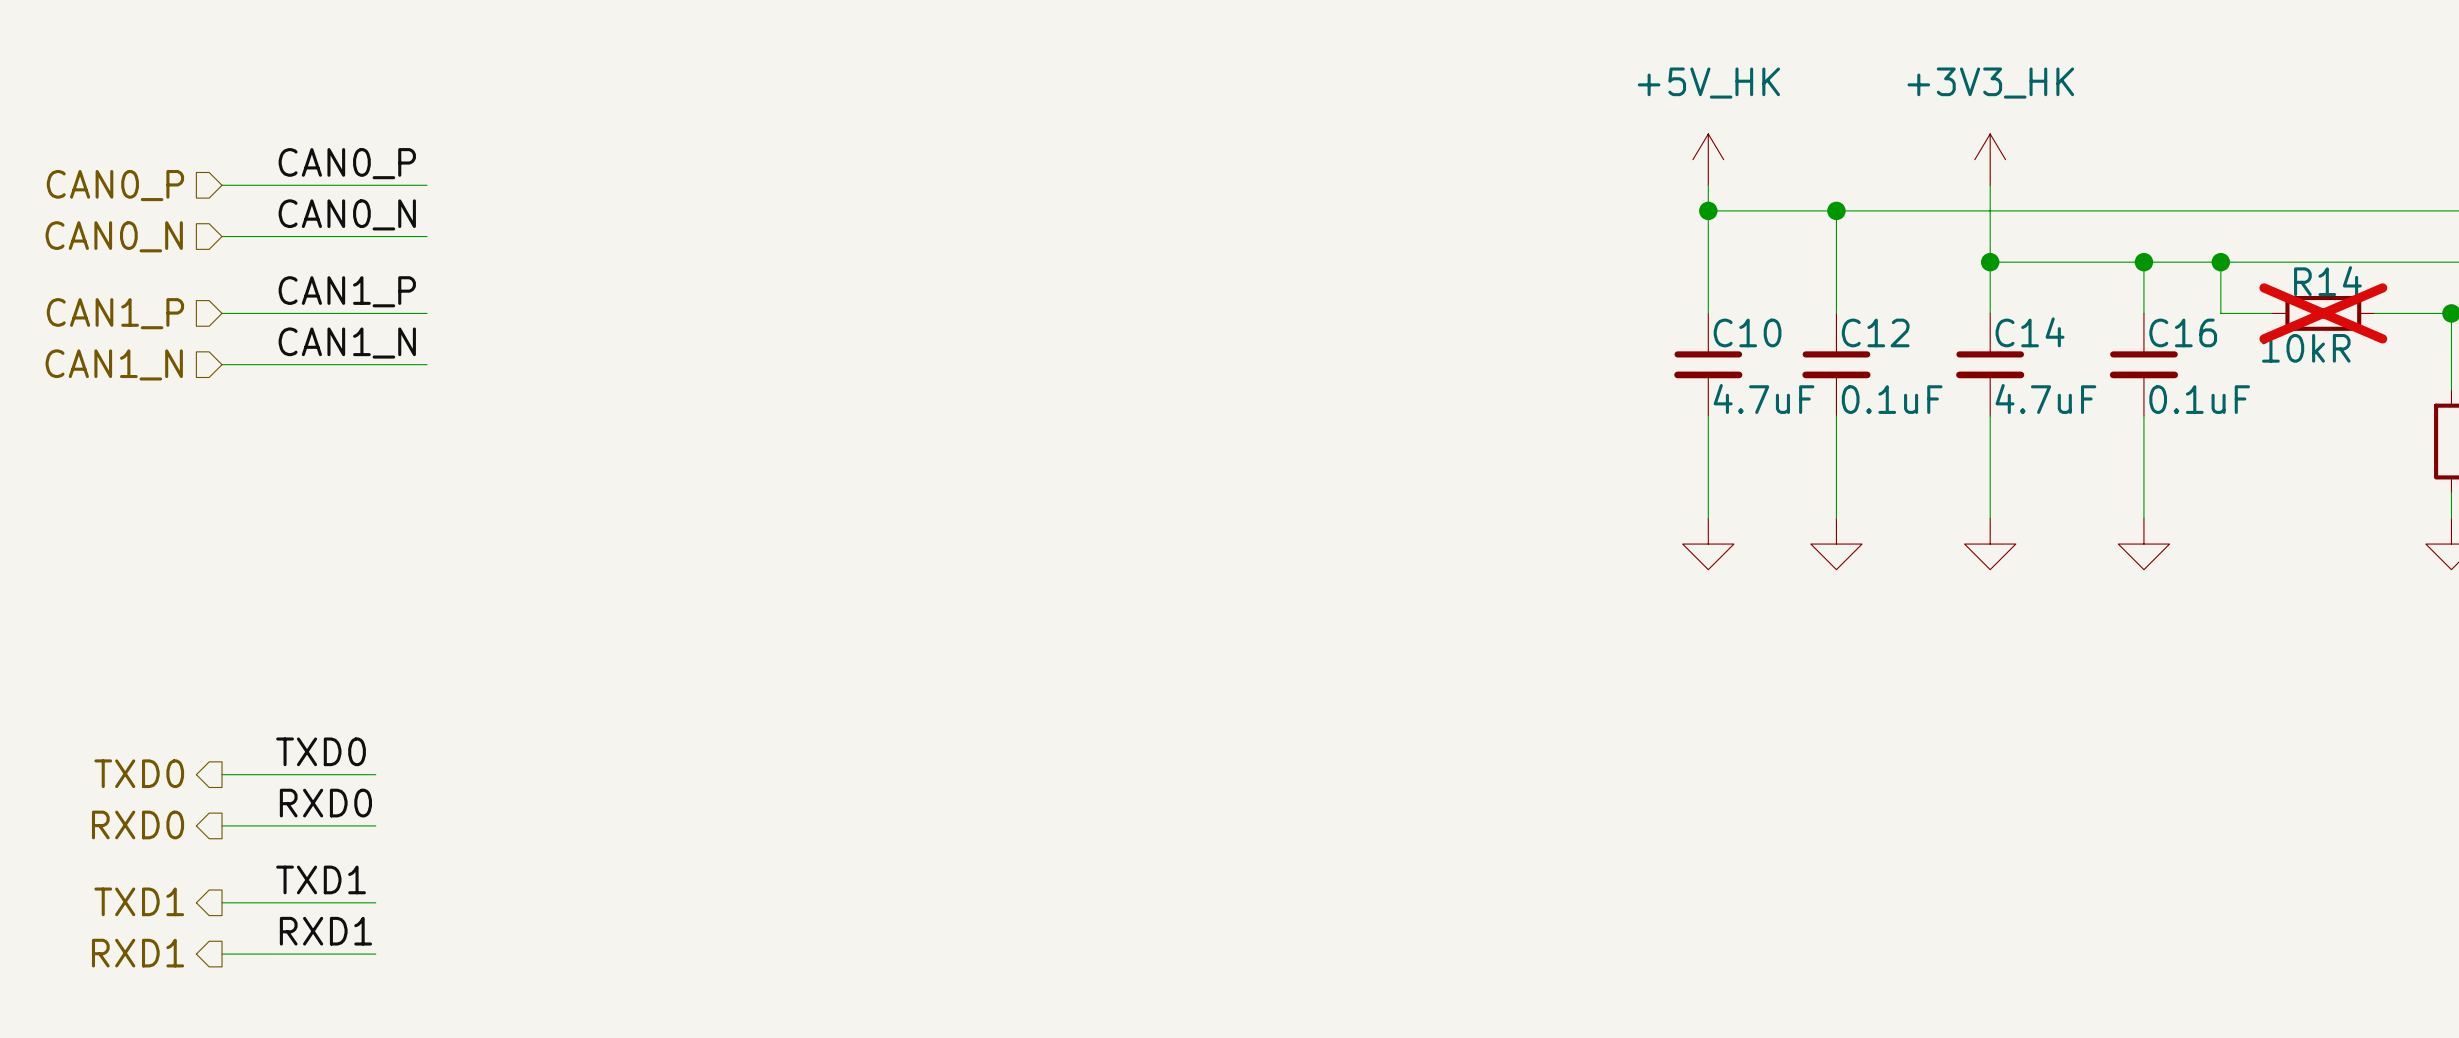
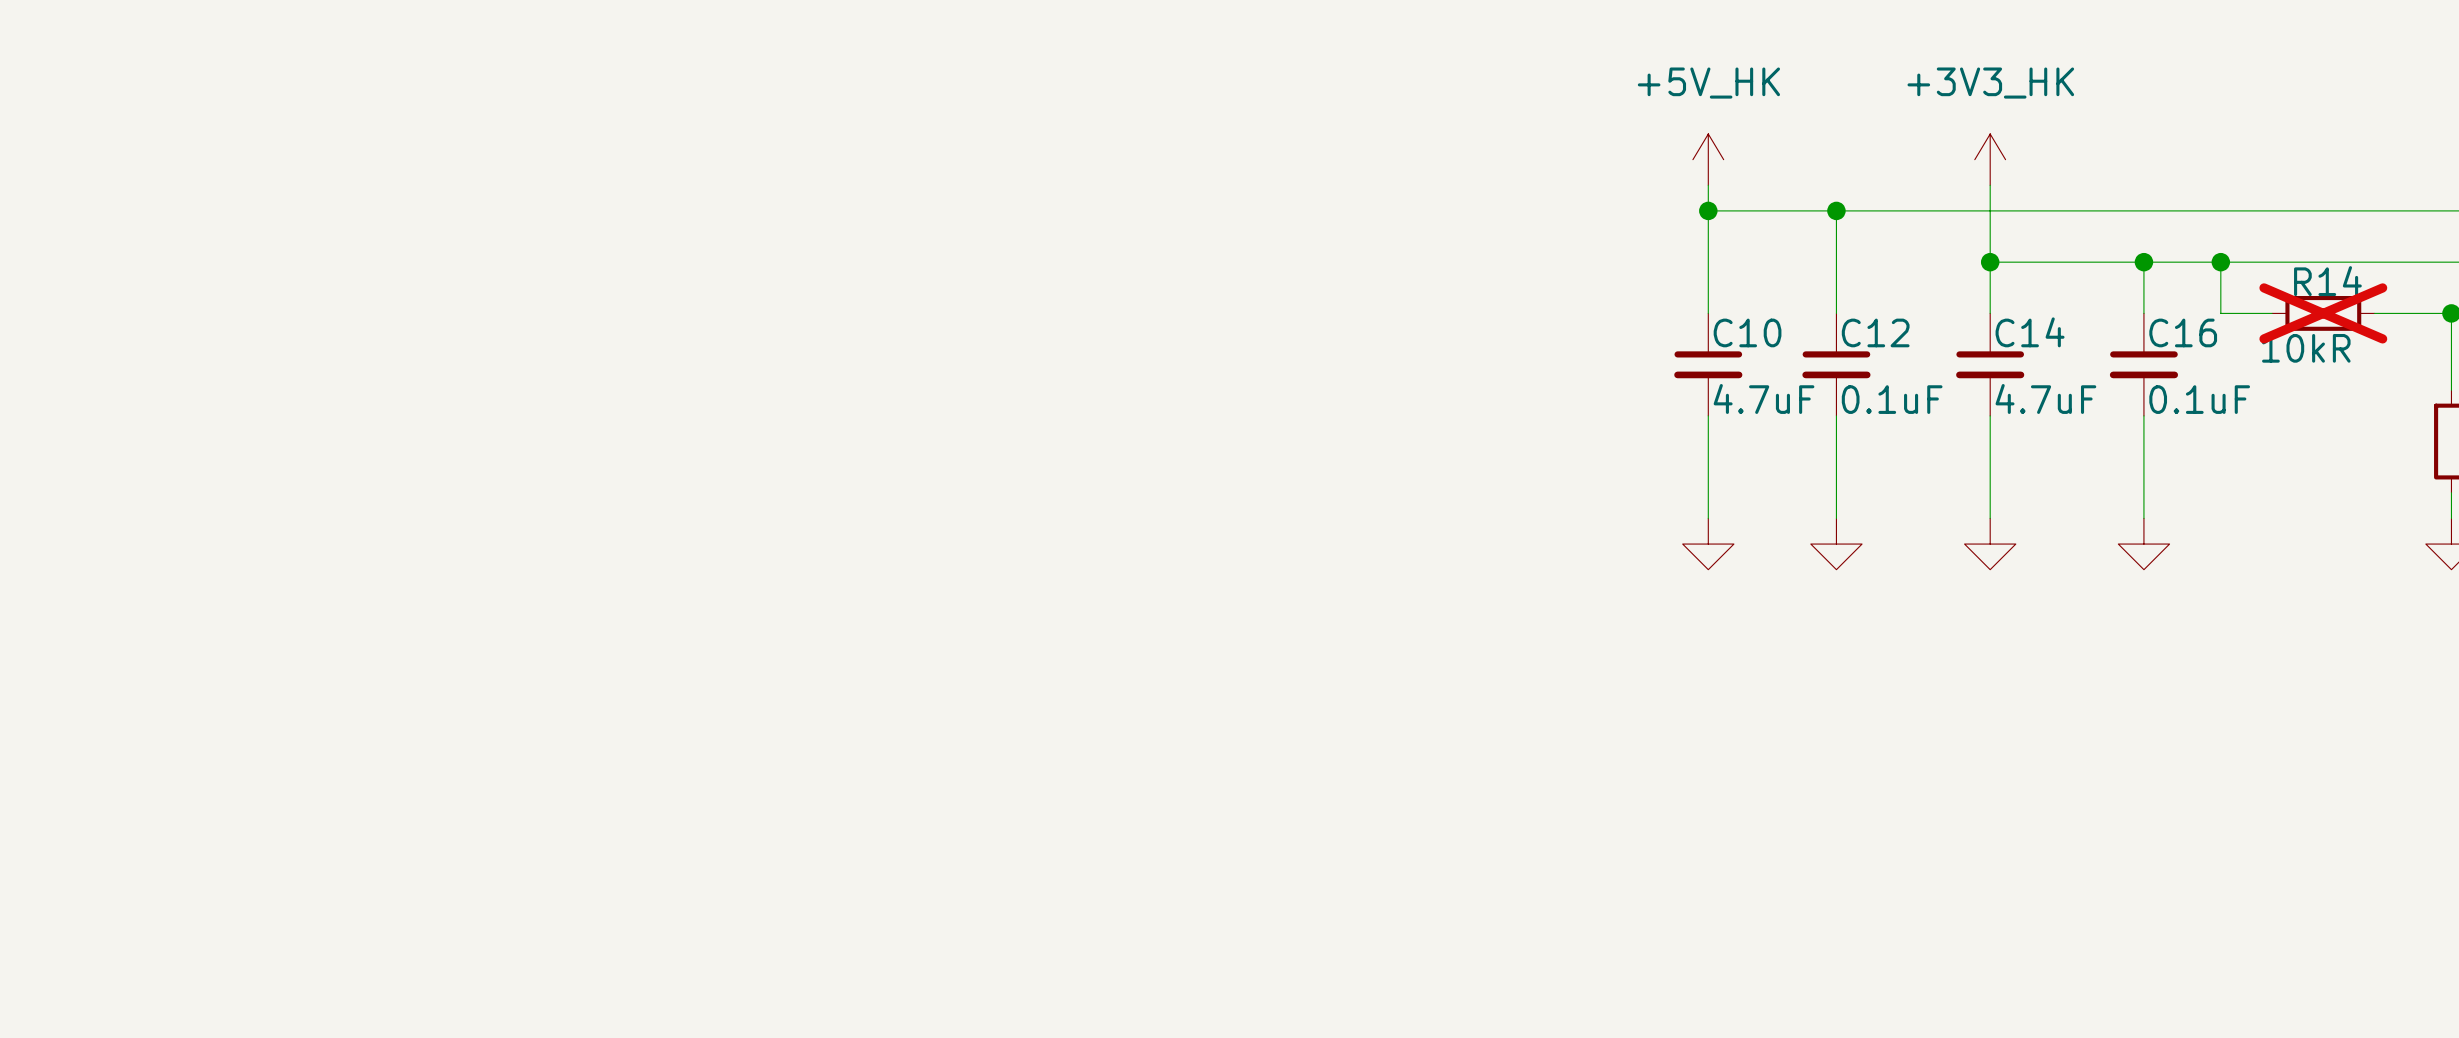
label: CAN0_P (347, 163) -> none
hierarchical label: CAN0_P (115, 185) -> none
wire: (222, 185) (427, 185) -> none
label: CAN0_N (347, 214) -> none
hierarchical label: CAN0_N (114, 236) -> none
wire: (222, 236) (427, 236) -> none
label: CAN1_P (347, 291) -> none
hierarchical label: CAN1_P (115, 313) -> none
wire: (222, 313) (427, 313) -> none
label: CAN1_N (347, 343) -> none
hierarchical label: CAN1_N (114, 364) -> none
wire: (222, 364) (427, 364) -> none
label: TXD0 (321, 751) -> none
hierarchical label: TXD0 (139, 773) -> none
wire: (222, 774) (375, 774) -> none
label: RXD0 (325, 803) -> none
hierarchical label: RXD0 (138, 824) -> none
wire: (222, 825) (375, 825) -> none
label: TXD1 (321, 879) -> none
hierarchical label: TXD1 (139, 901) -> none
wire: (222, 902) (375, 902) -> none
label: RXD1 (325, 931) -> none
hierarchical label: RXD1 (138, 953) -> none
wire: (222, 954) (375, 954) -> none

